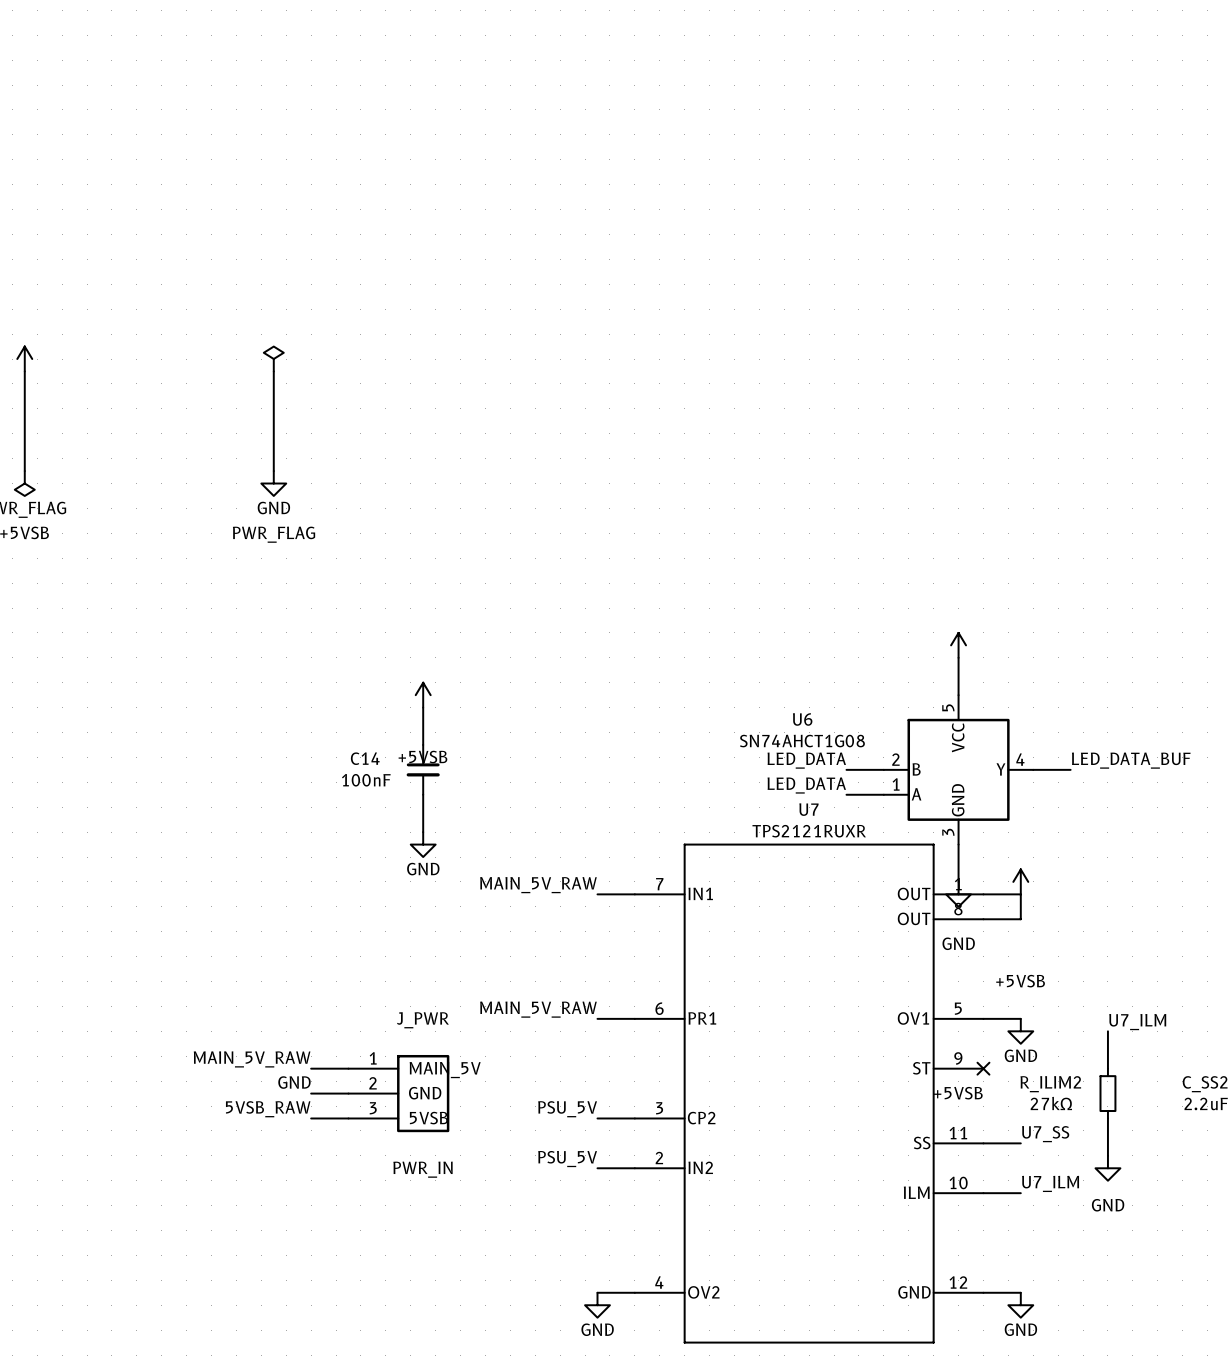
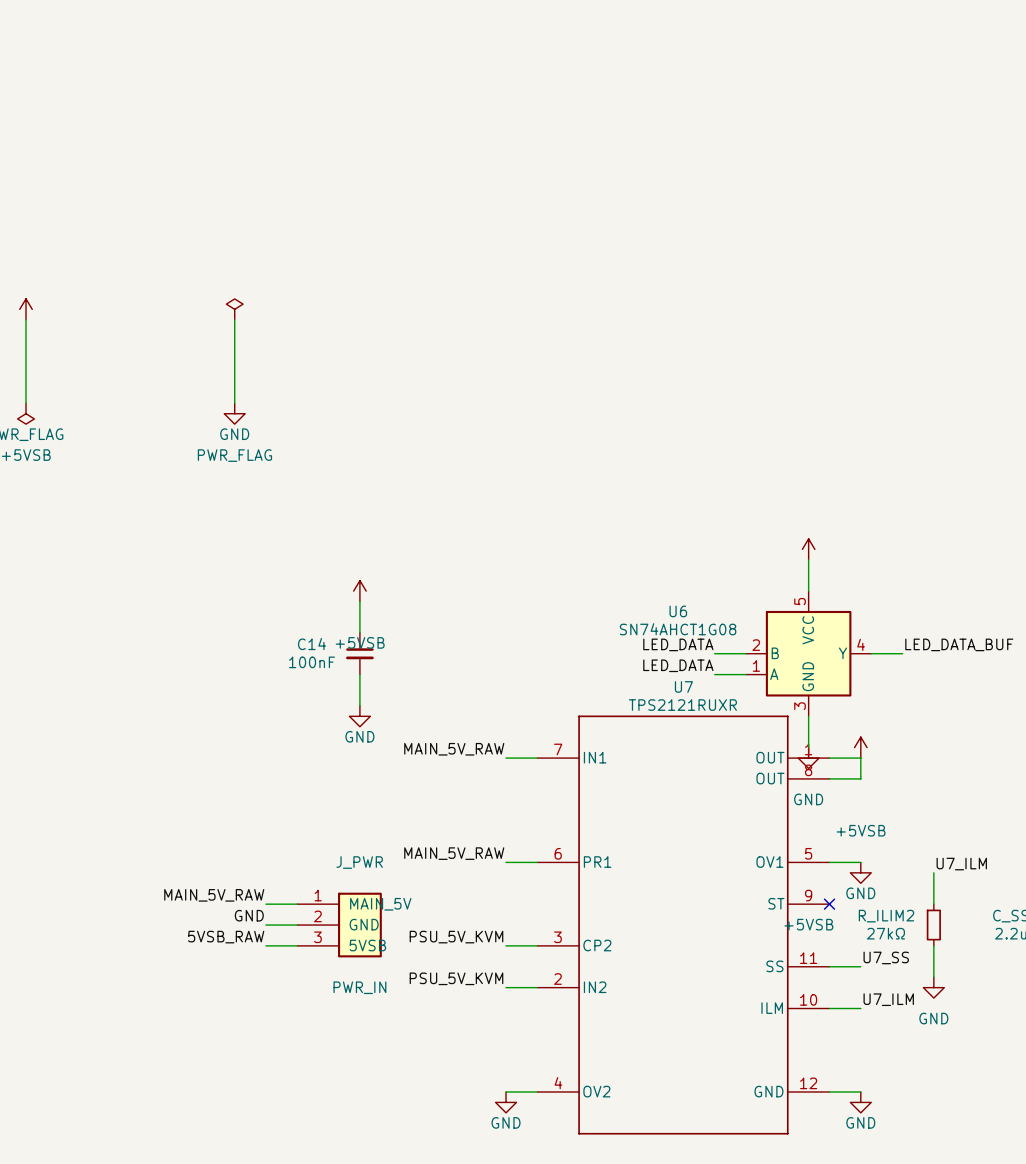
label: PSU_5V (567, 1109) -> PSU_5V_KVM (456, 937)
label: PSU_5V (567, 1159) -> PSU_5V_KVM (456, 978)

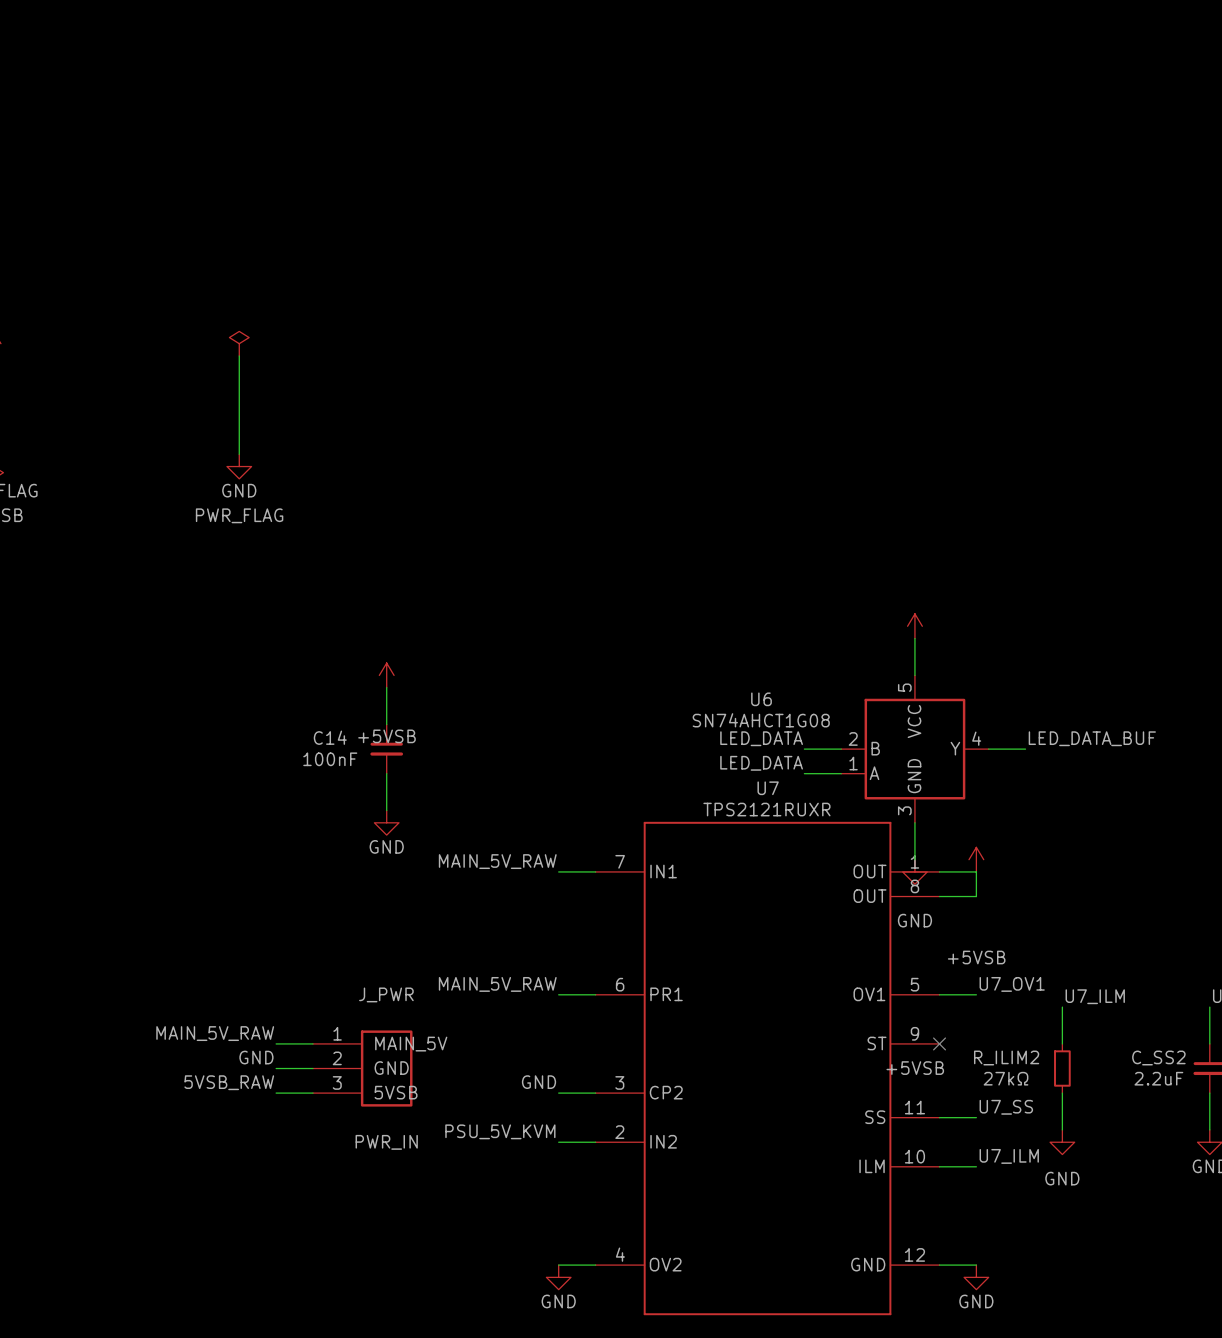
label: none -> U7_OV1 (1012, 984)
power symbol: GND (860, 872) -> none
label: PSU_5V_KVM (456, 937) -> GND (539, 1082)

